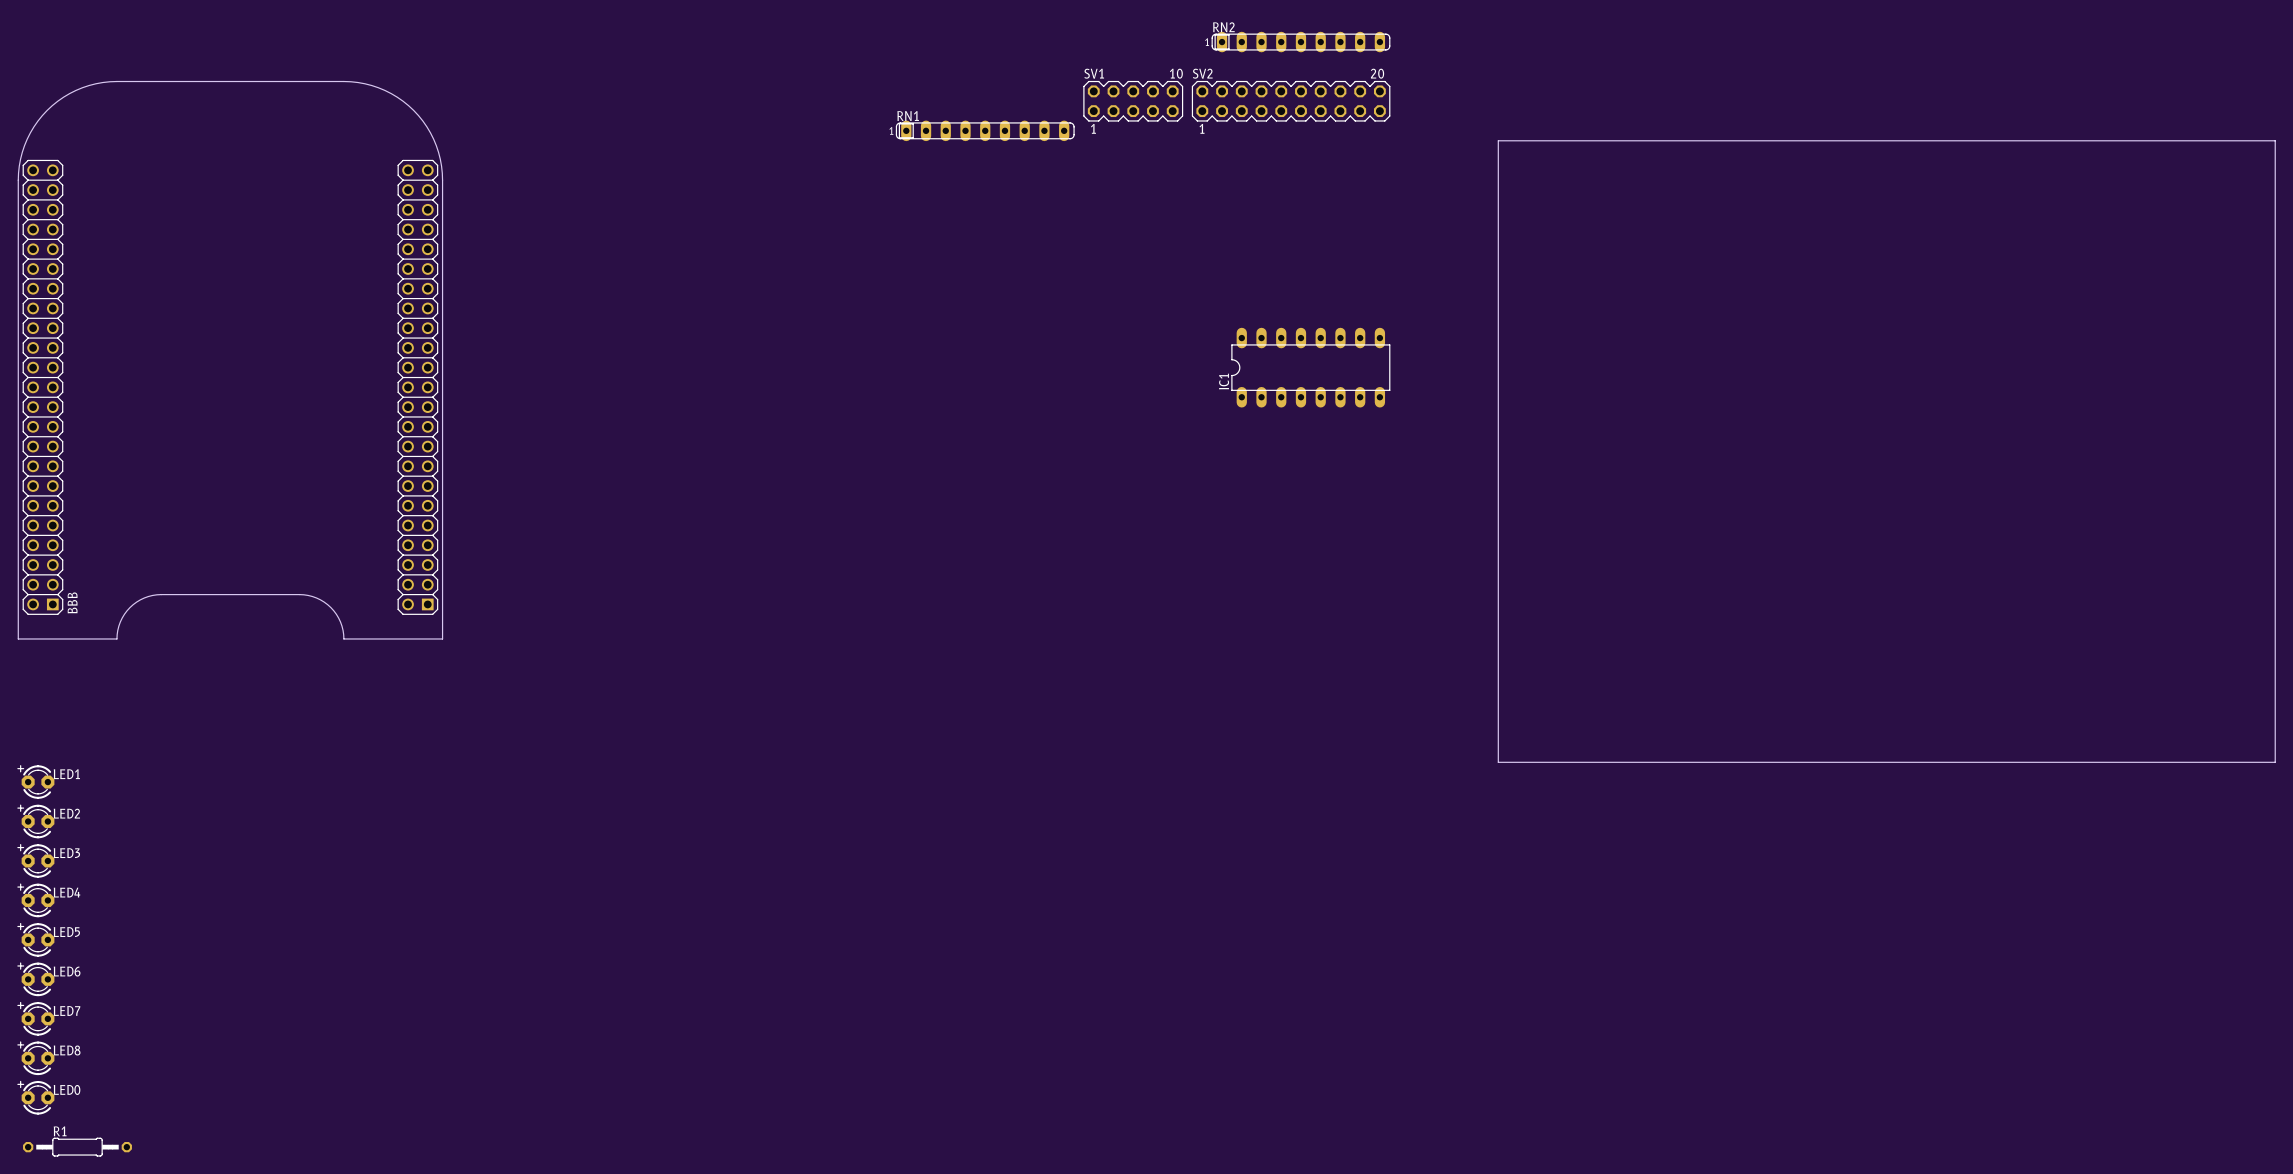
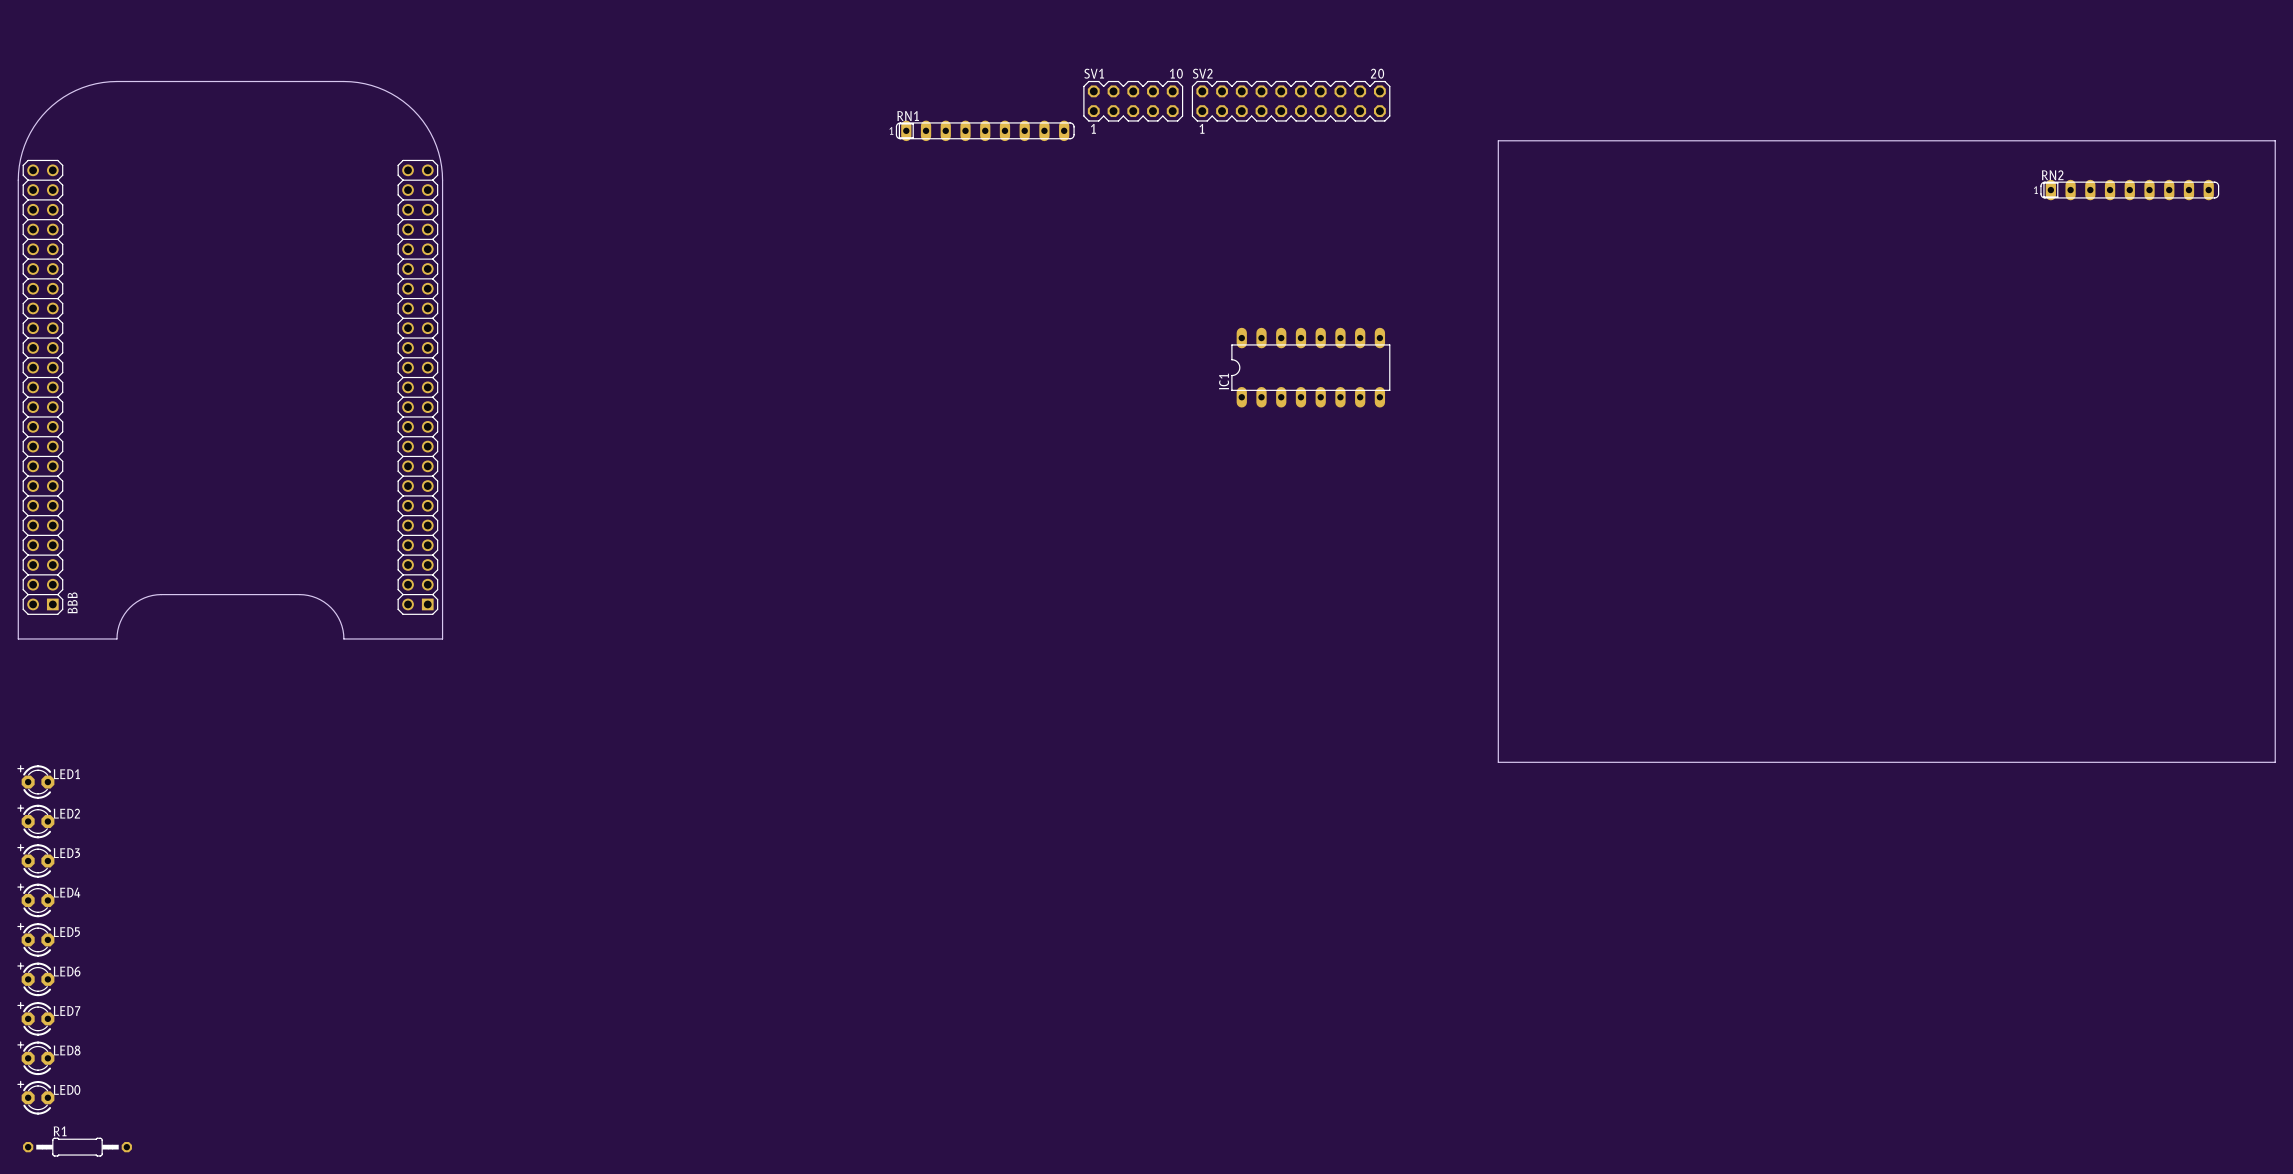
RN2 position: (1300, 42) -> (2129, 190)

